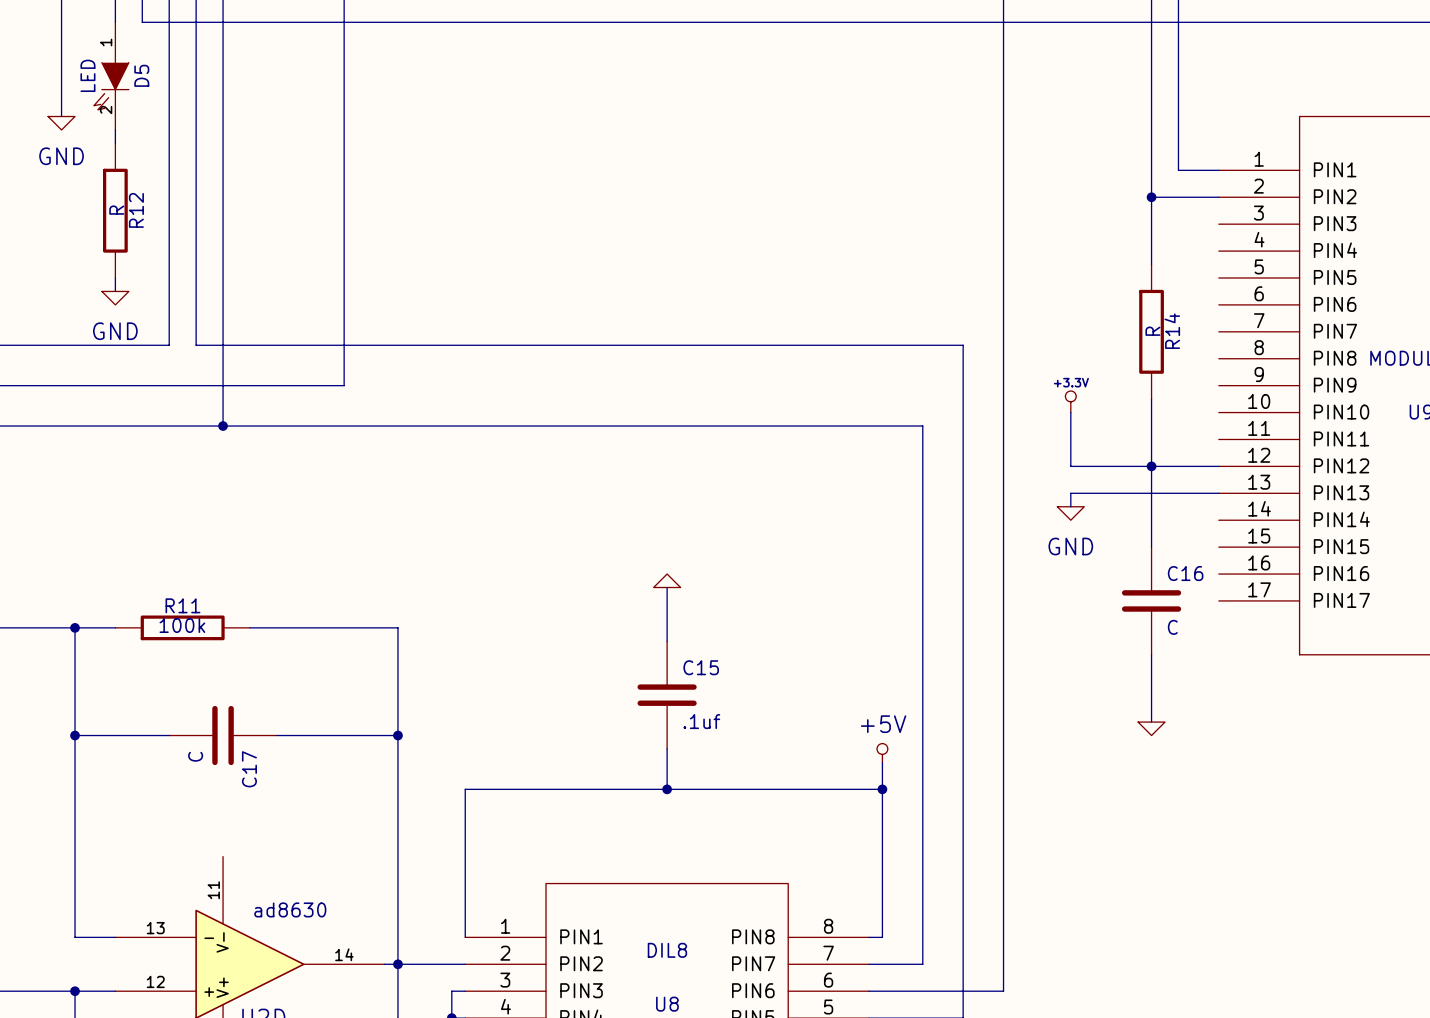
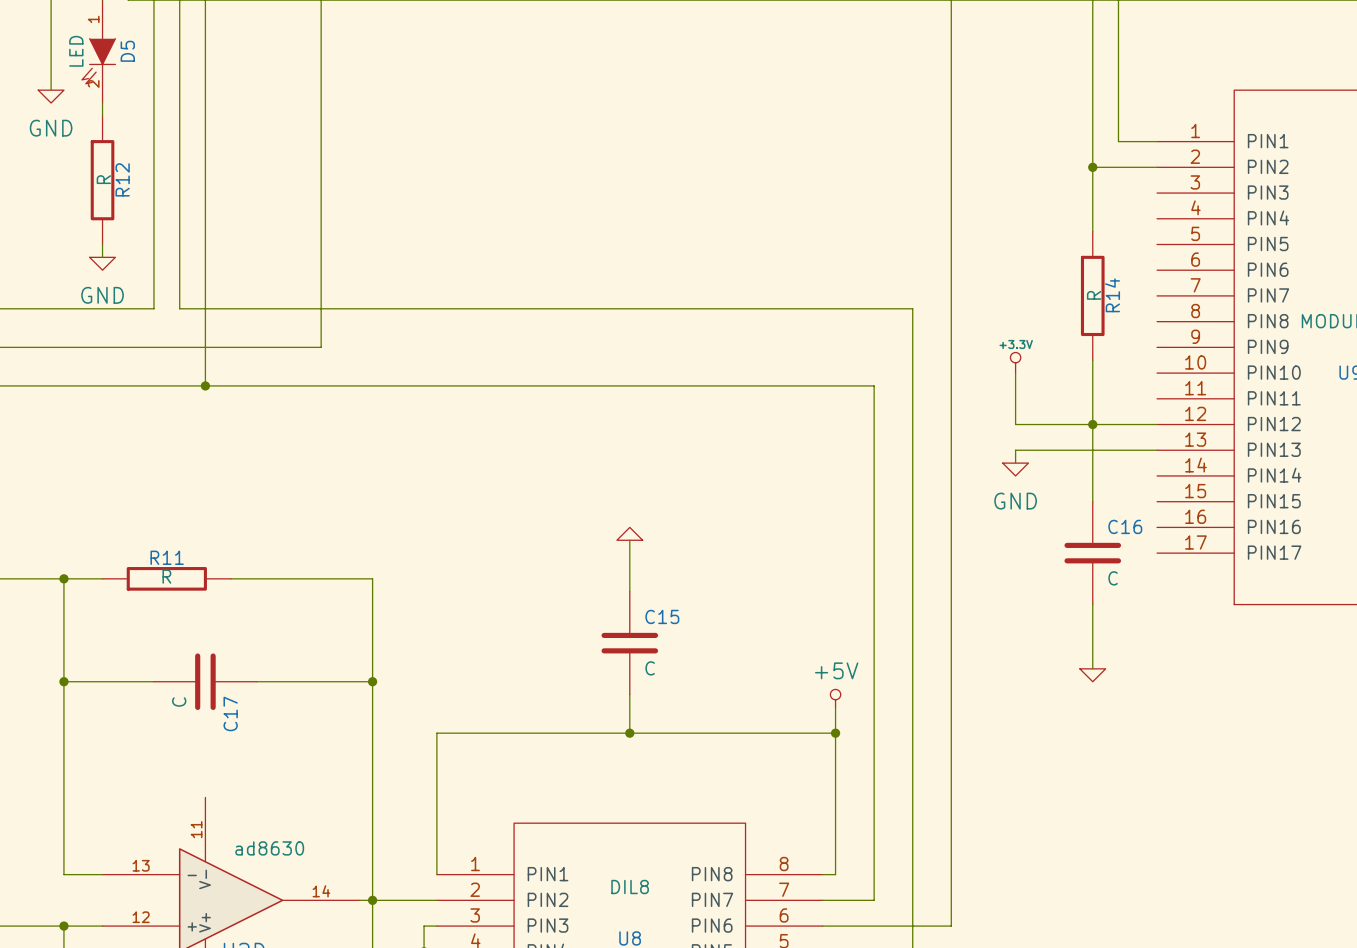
R11 value: 100k (182, 625) -> R (166, 576)
C15 value: .1uf (701, 721) -> C (650, 668)

